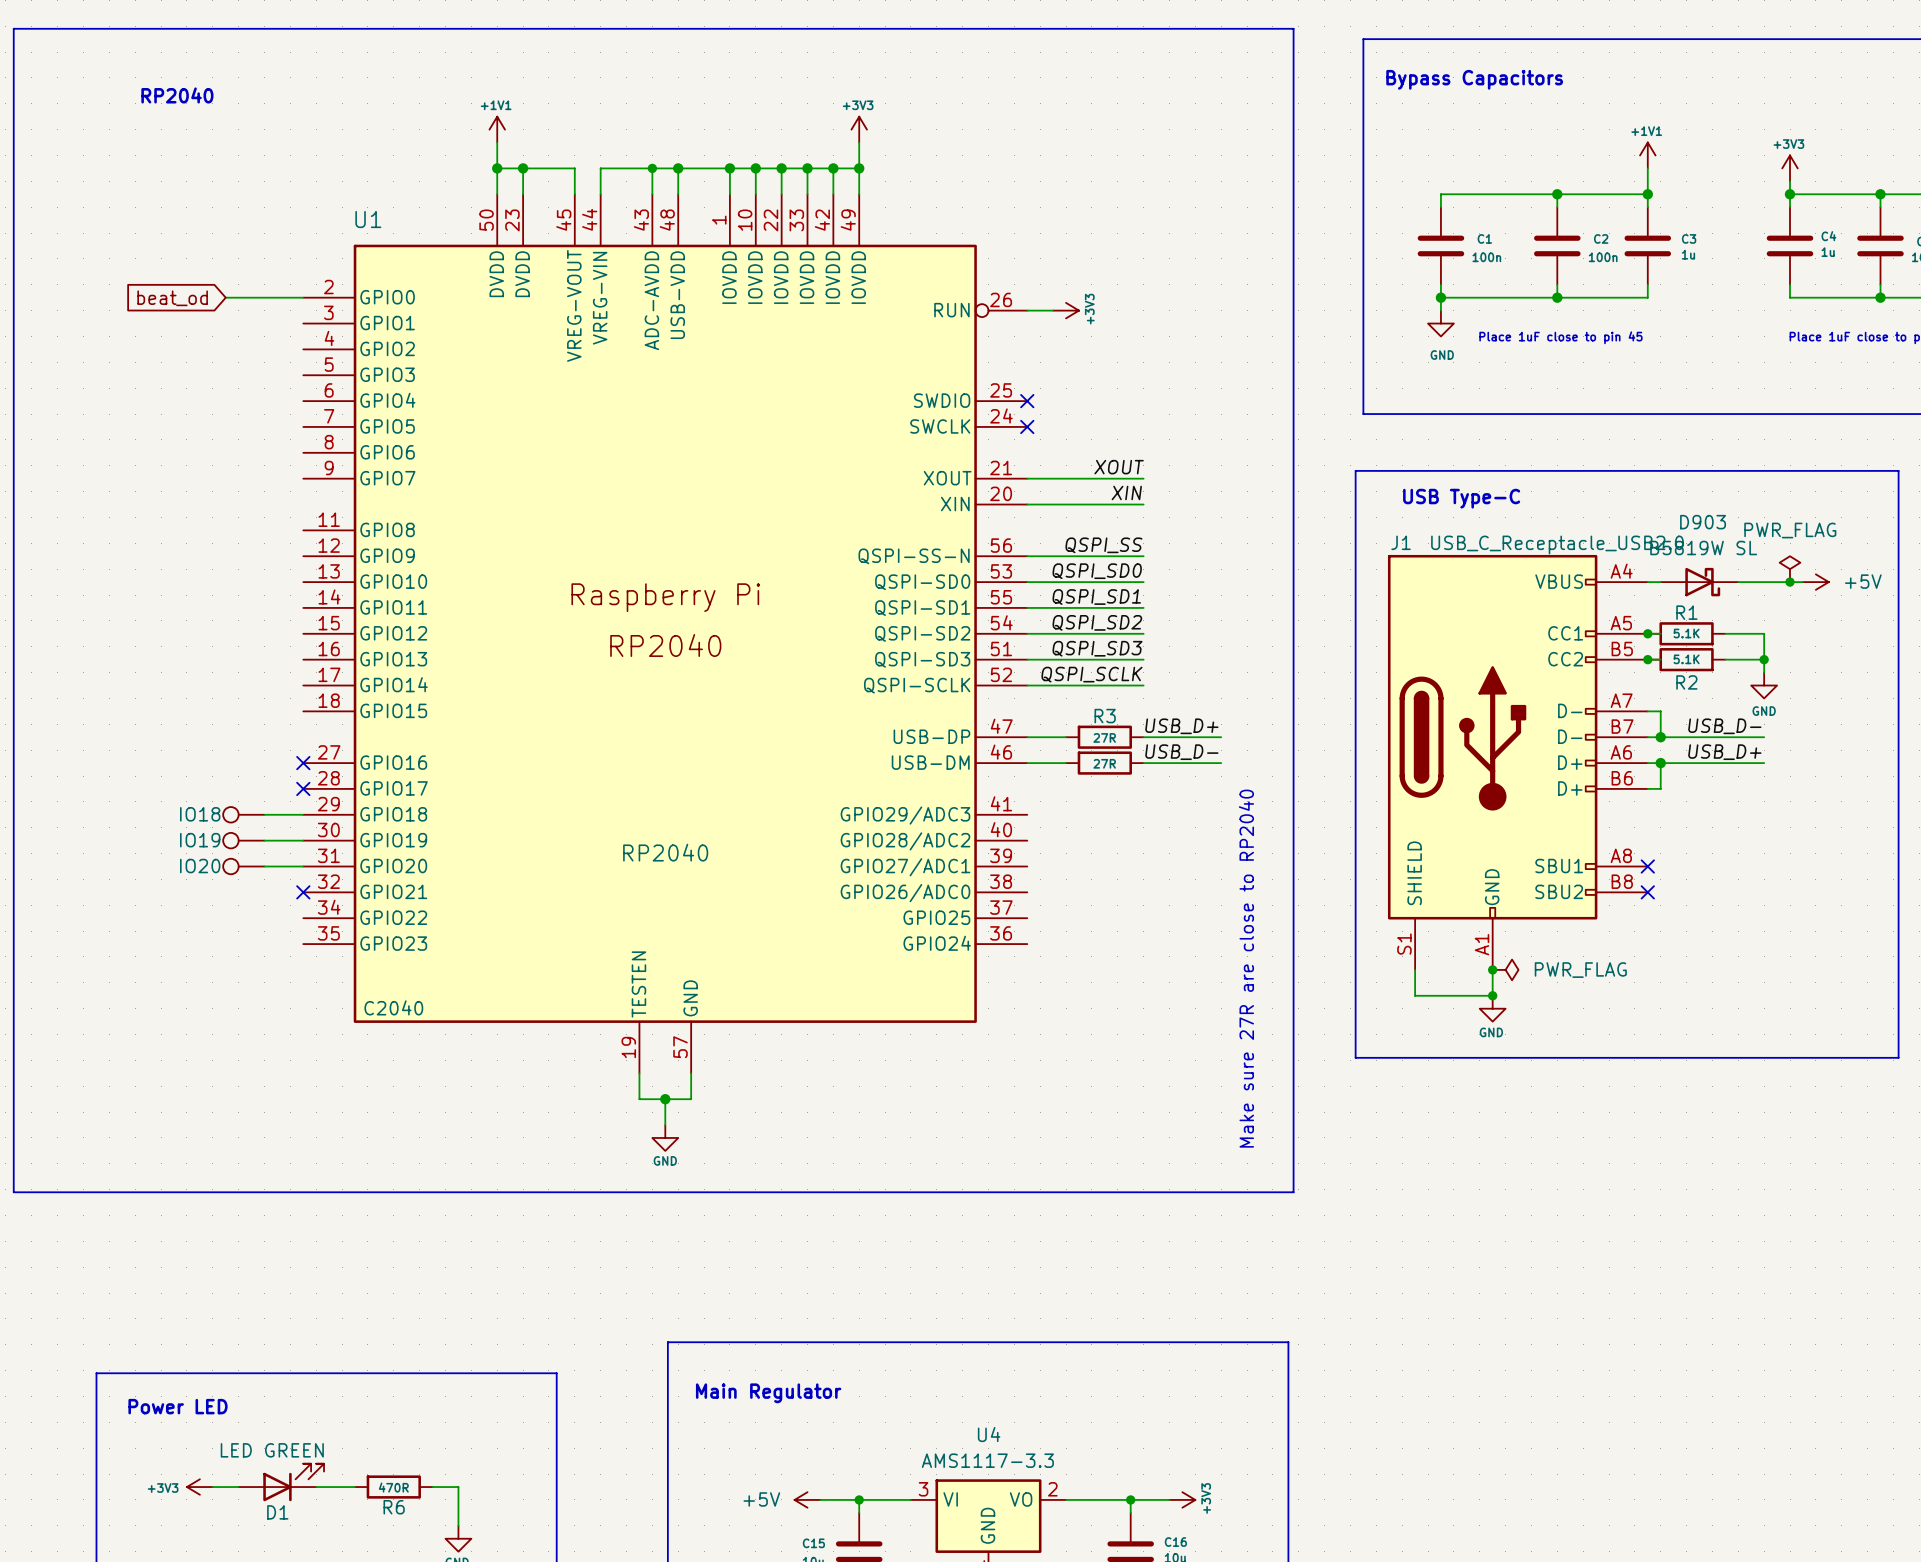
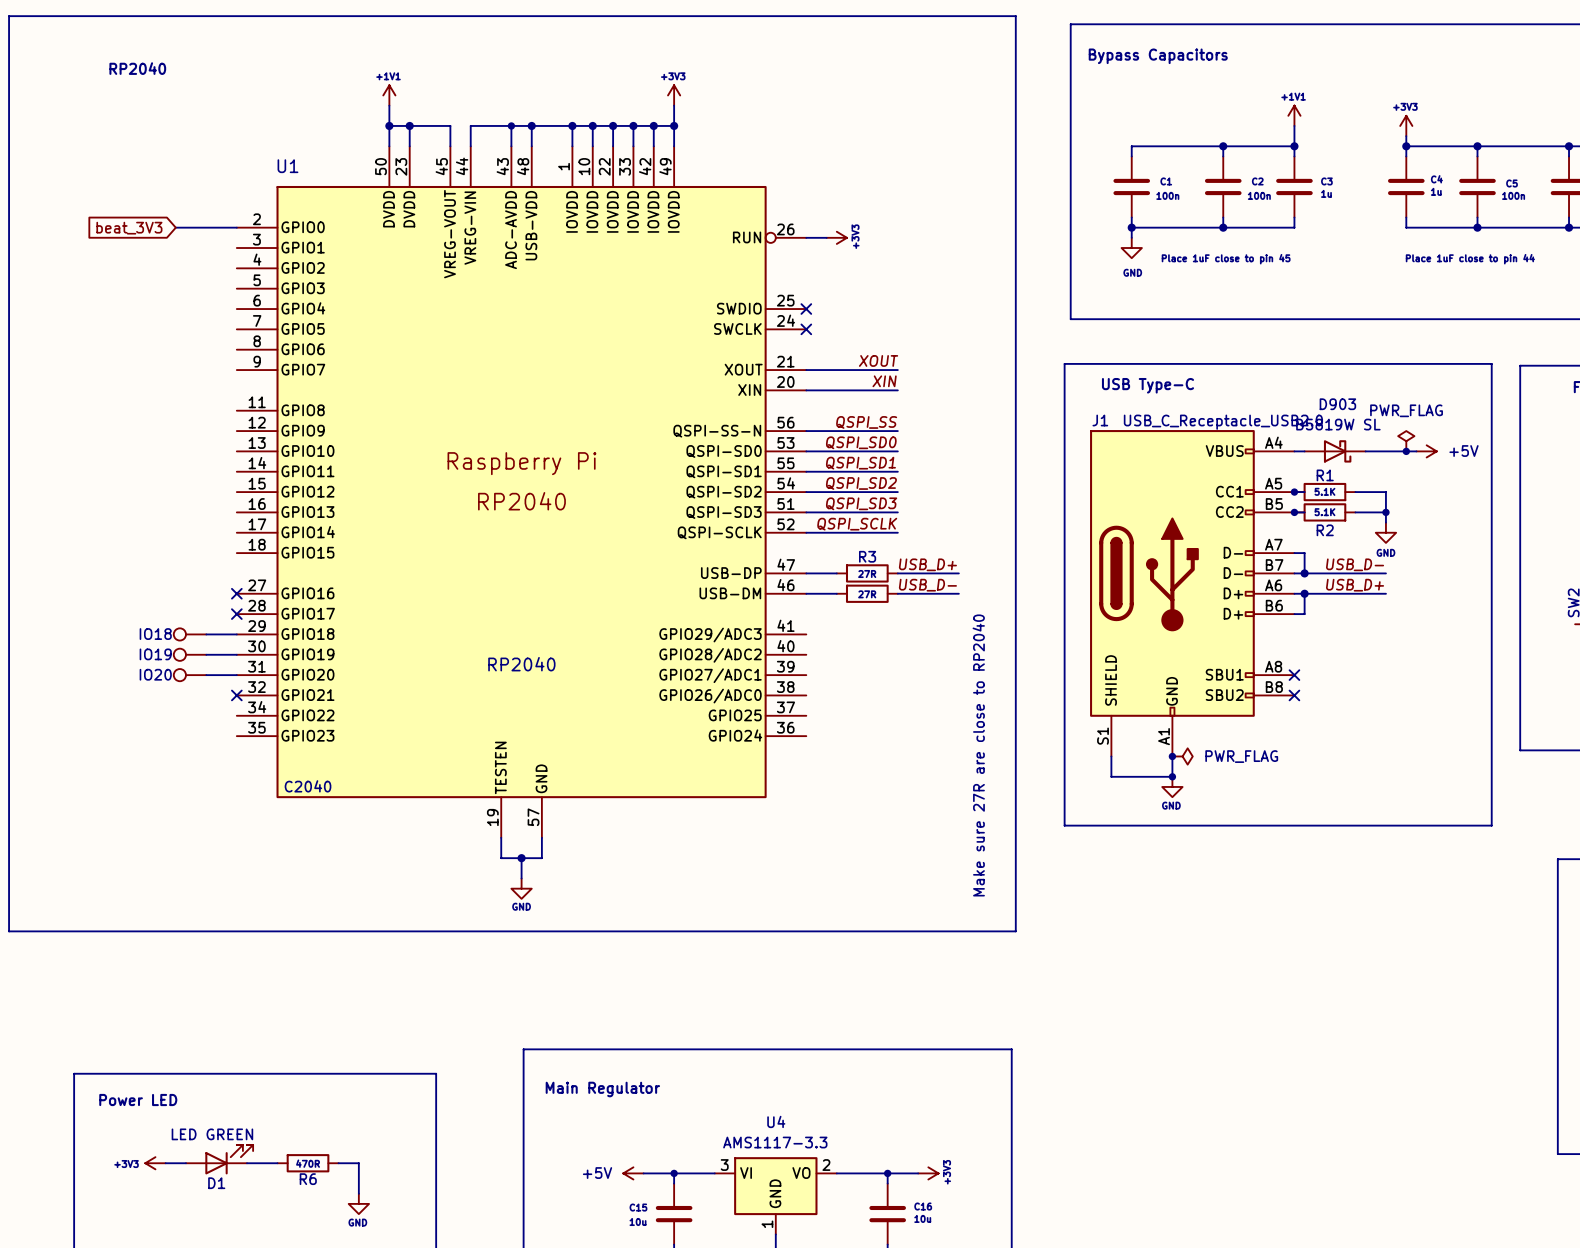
global label: beat_od (172, 298) -> beat_3V3 (129, 228)

